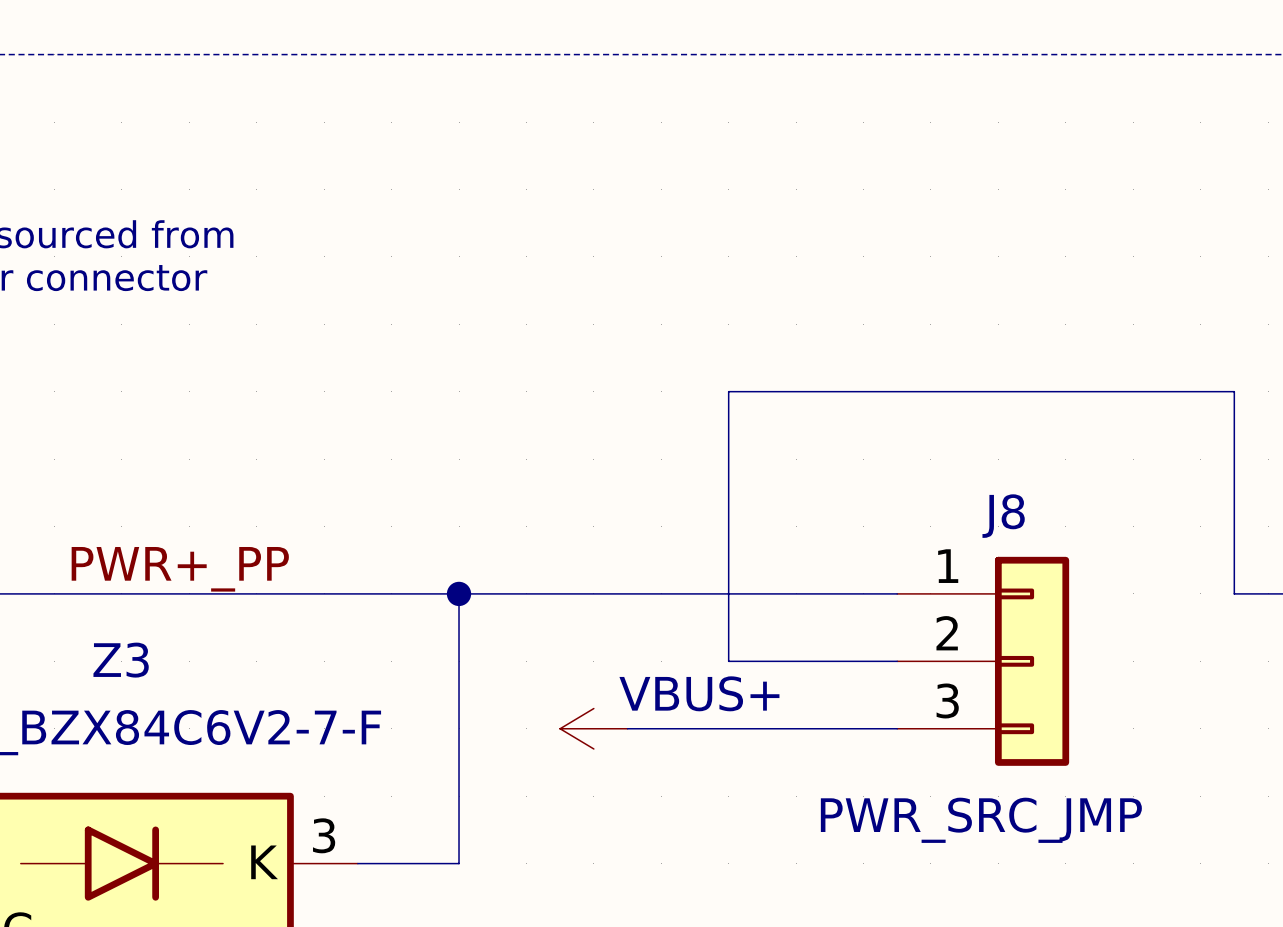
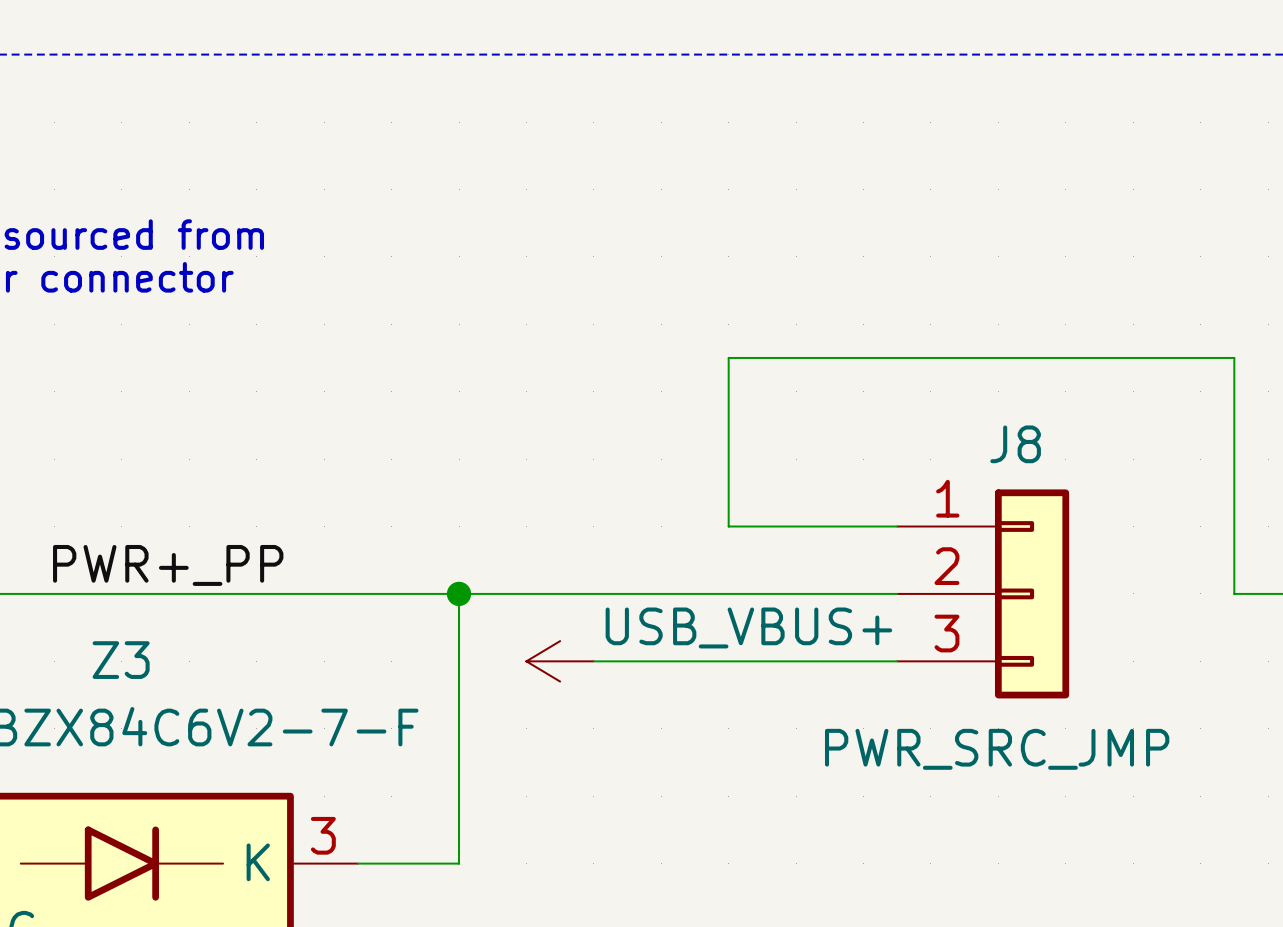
wire: (728, 391) (1234, 391) -> (728, 391) (728, 357) (1234, 357) (1234, 391)
wire: (728, 526) (728, 661) -> (593, 661) (728, 661)
wire: none -> (728, 526) (897, 526)
power symbol: none -> USB_VBUS+ (560, 661)
J8 position: (983, 661) -> (983, 593)
power symbol: VBUS+ (593, 728) -> none
wire: (627, 728) (897, 728) -> none

